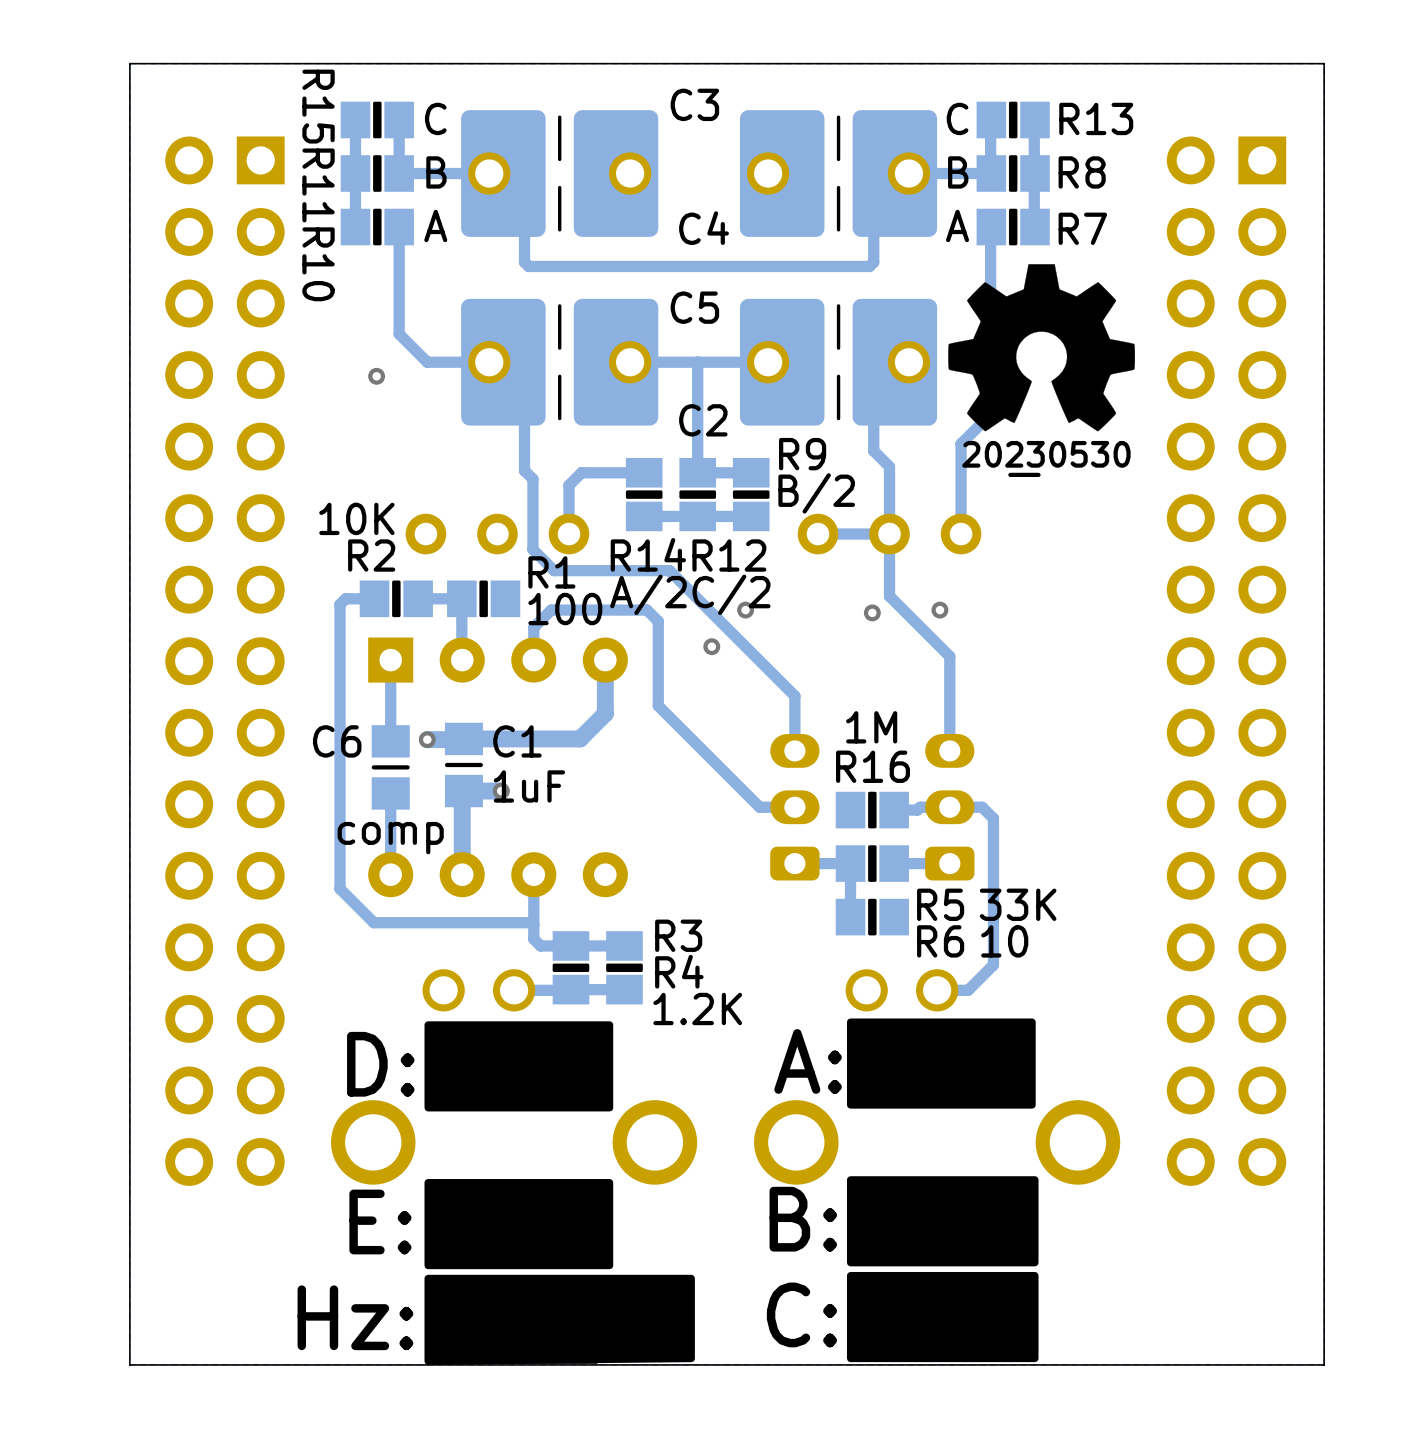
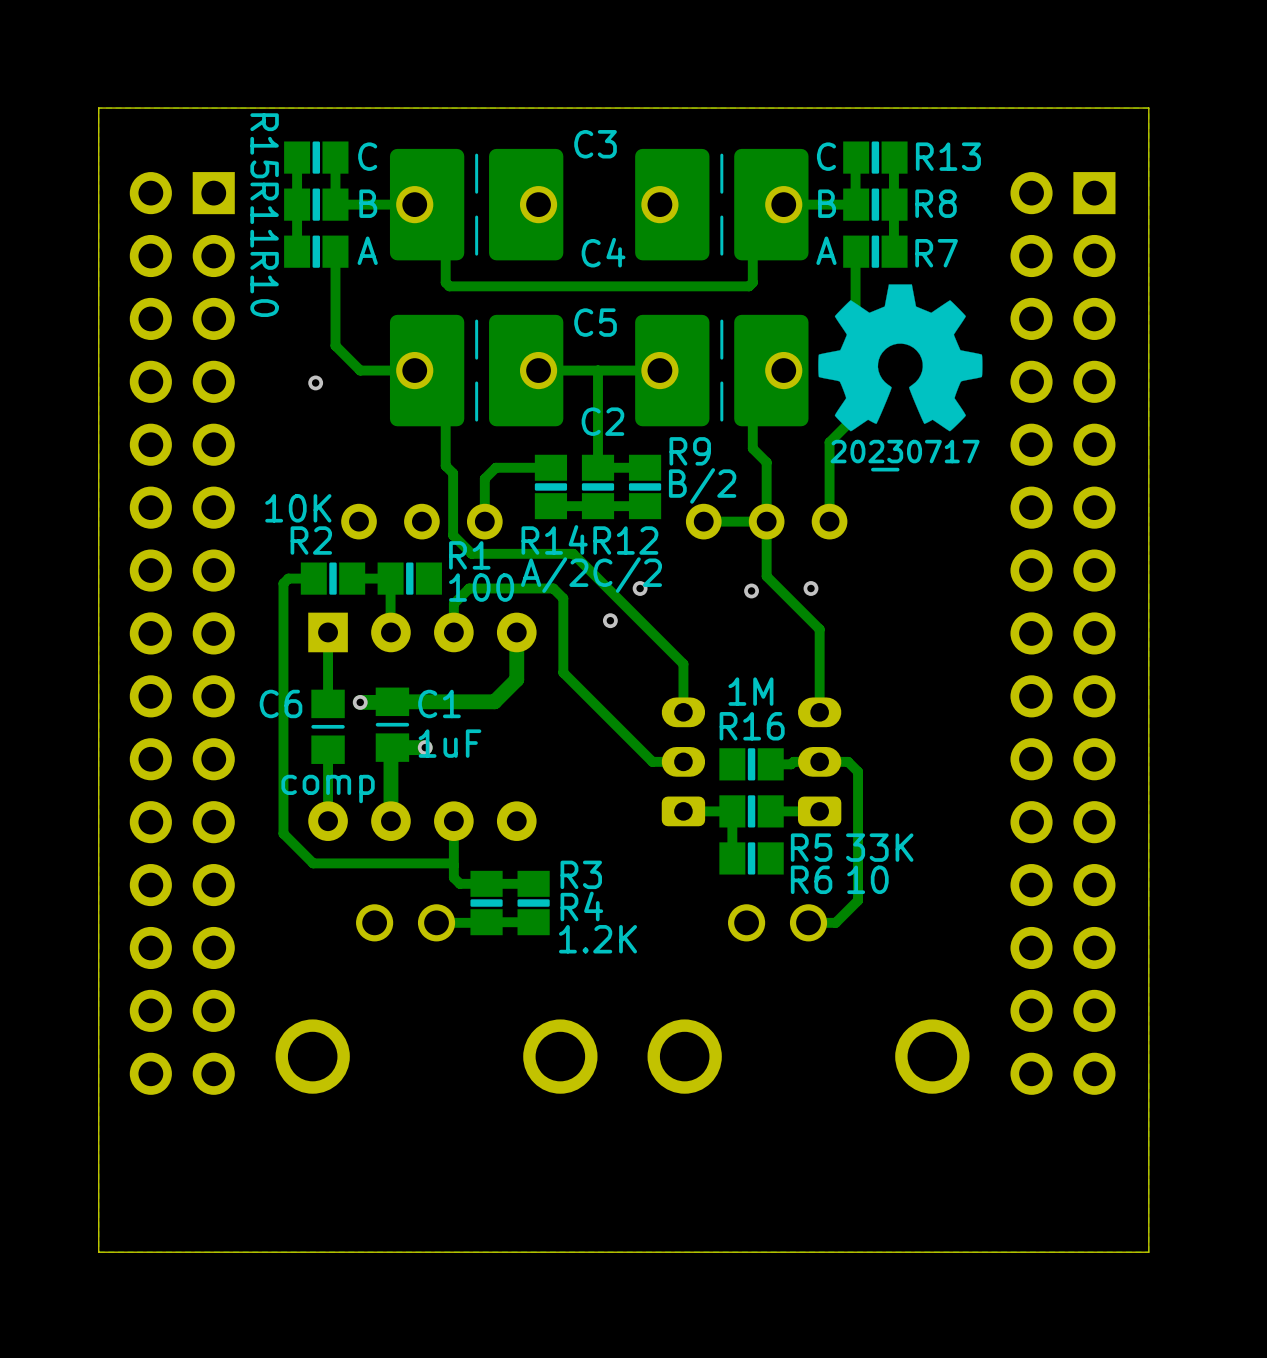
drawing shape: [962, 440, 1131, 478] -> [830, 439, 980, 472]
drawing: [846, 1018, 1036, 1109] -> none
drawing: [424, 1021, 614, 1112] -> none
drawing: [846, 1176, 1039, 1363] -> none
drawing: [424, 1179, 695, 1365] -> none

